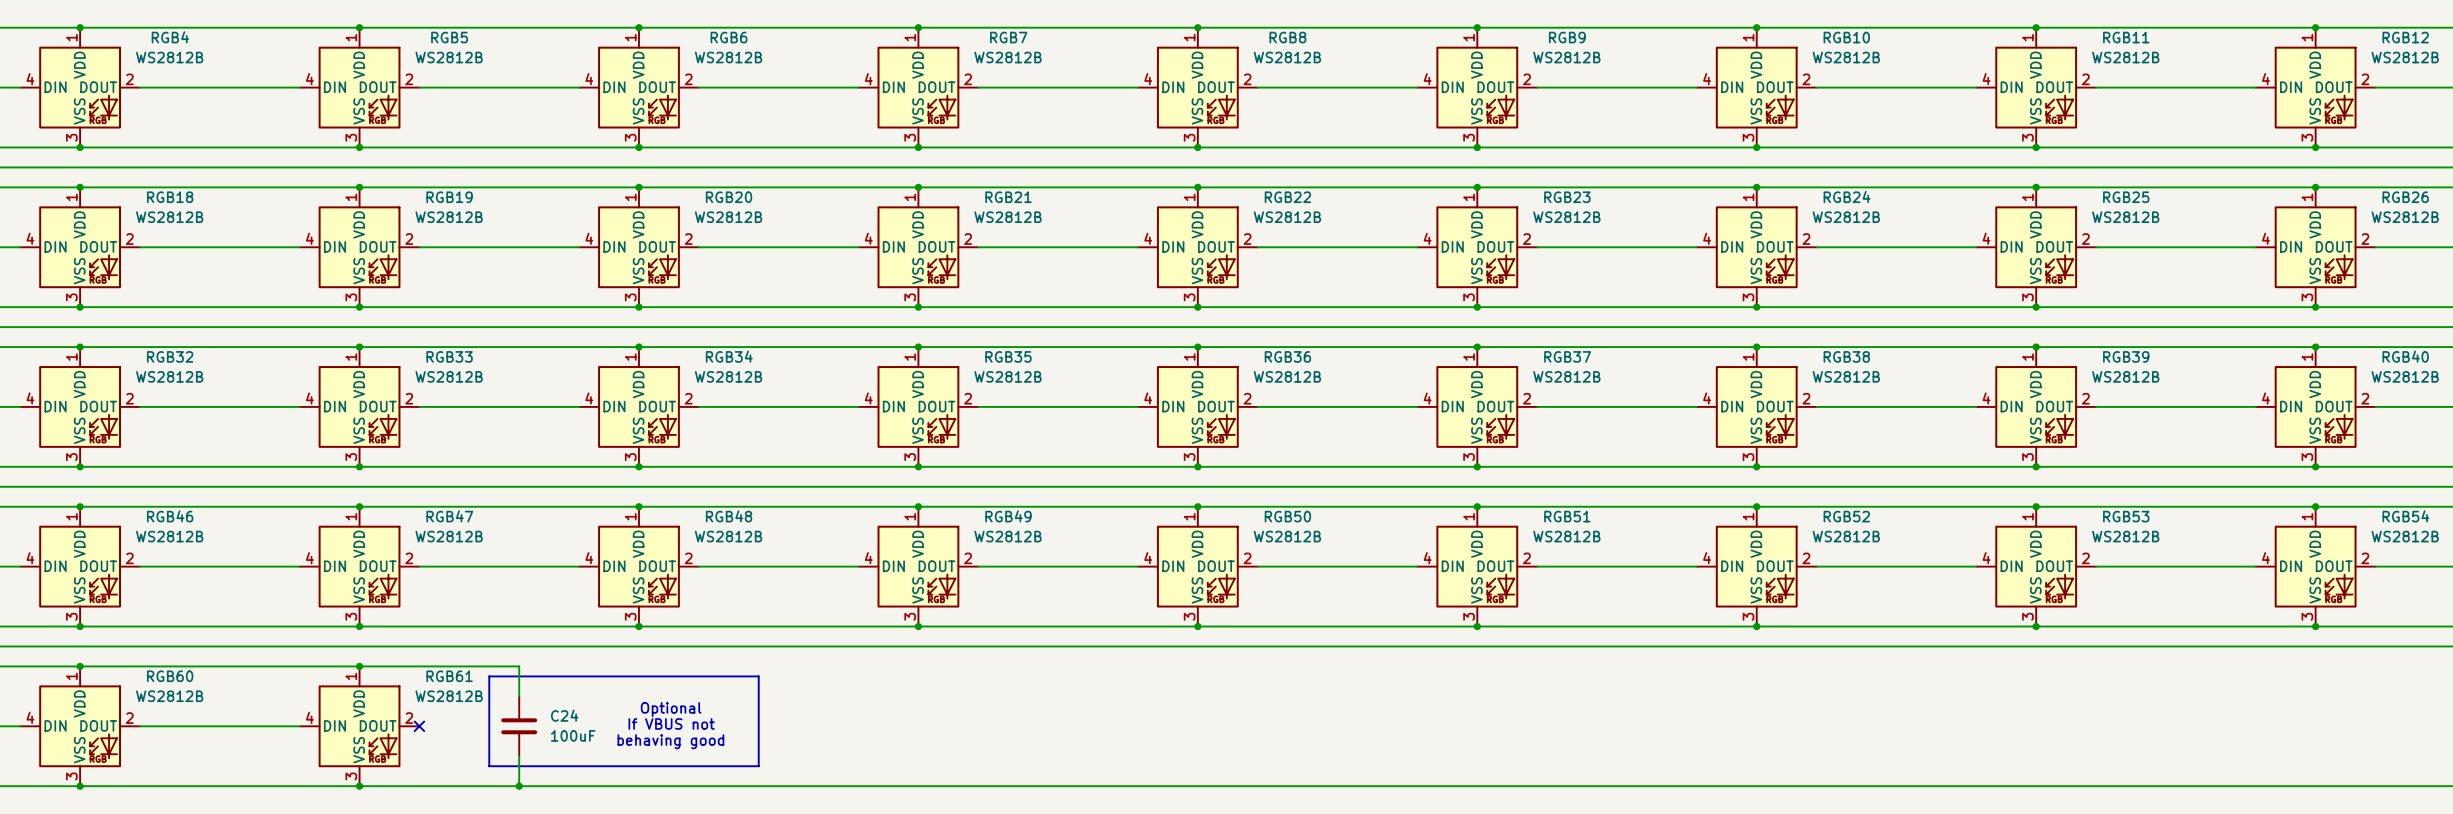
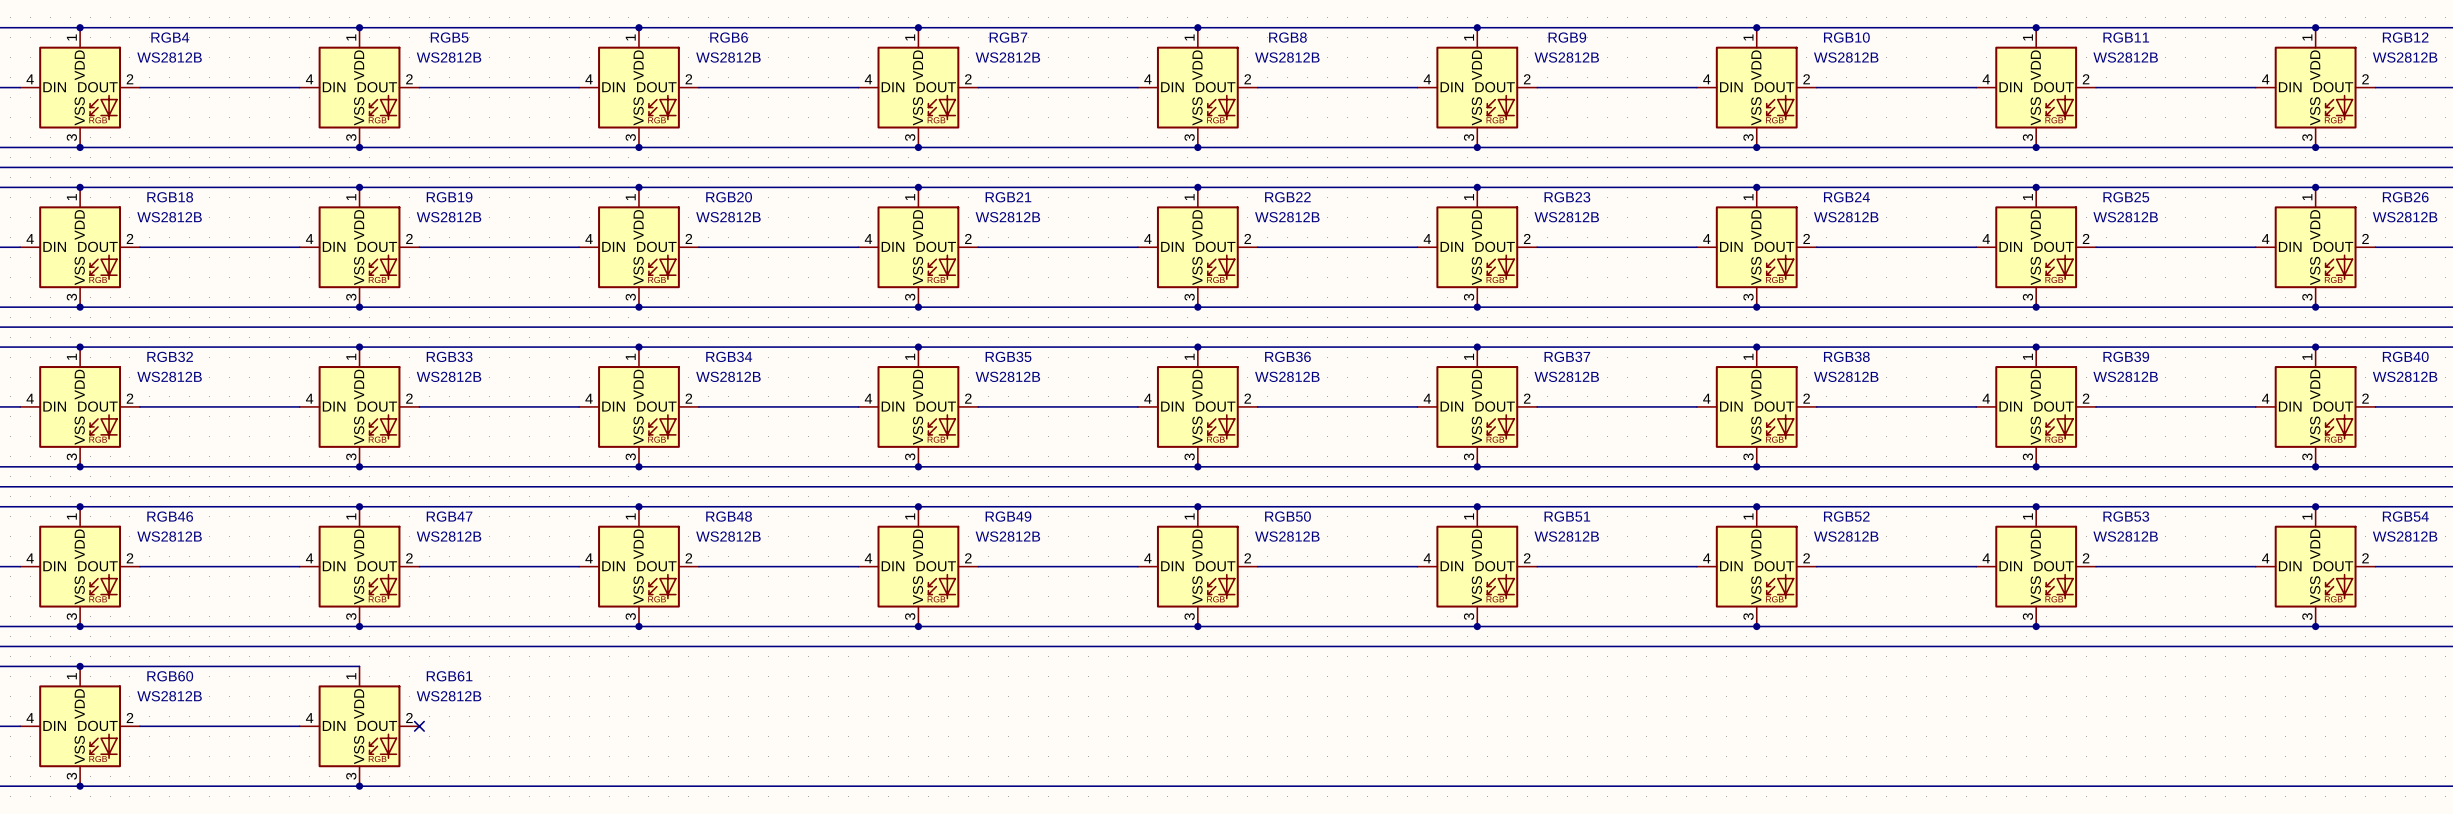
wire: (359, 666) (519, 666) (519, 696) -> none
junction: (359, 666) -> none
line: (489, 676) (758, 676) (758, 766) (489, 766) (489, 676) -> none
text: Optional (671, 709) -> none
text: If VBUS not (671, 723) -> none
C24: 100uF (519, 726) -> none
text: behaving good (670, 741) -> none
wire: (519, 756) (519, 786) -> none
junction: (519, 786) -> none

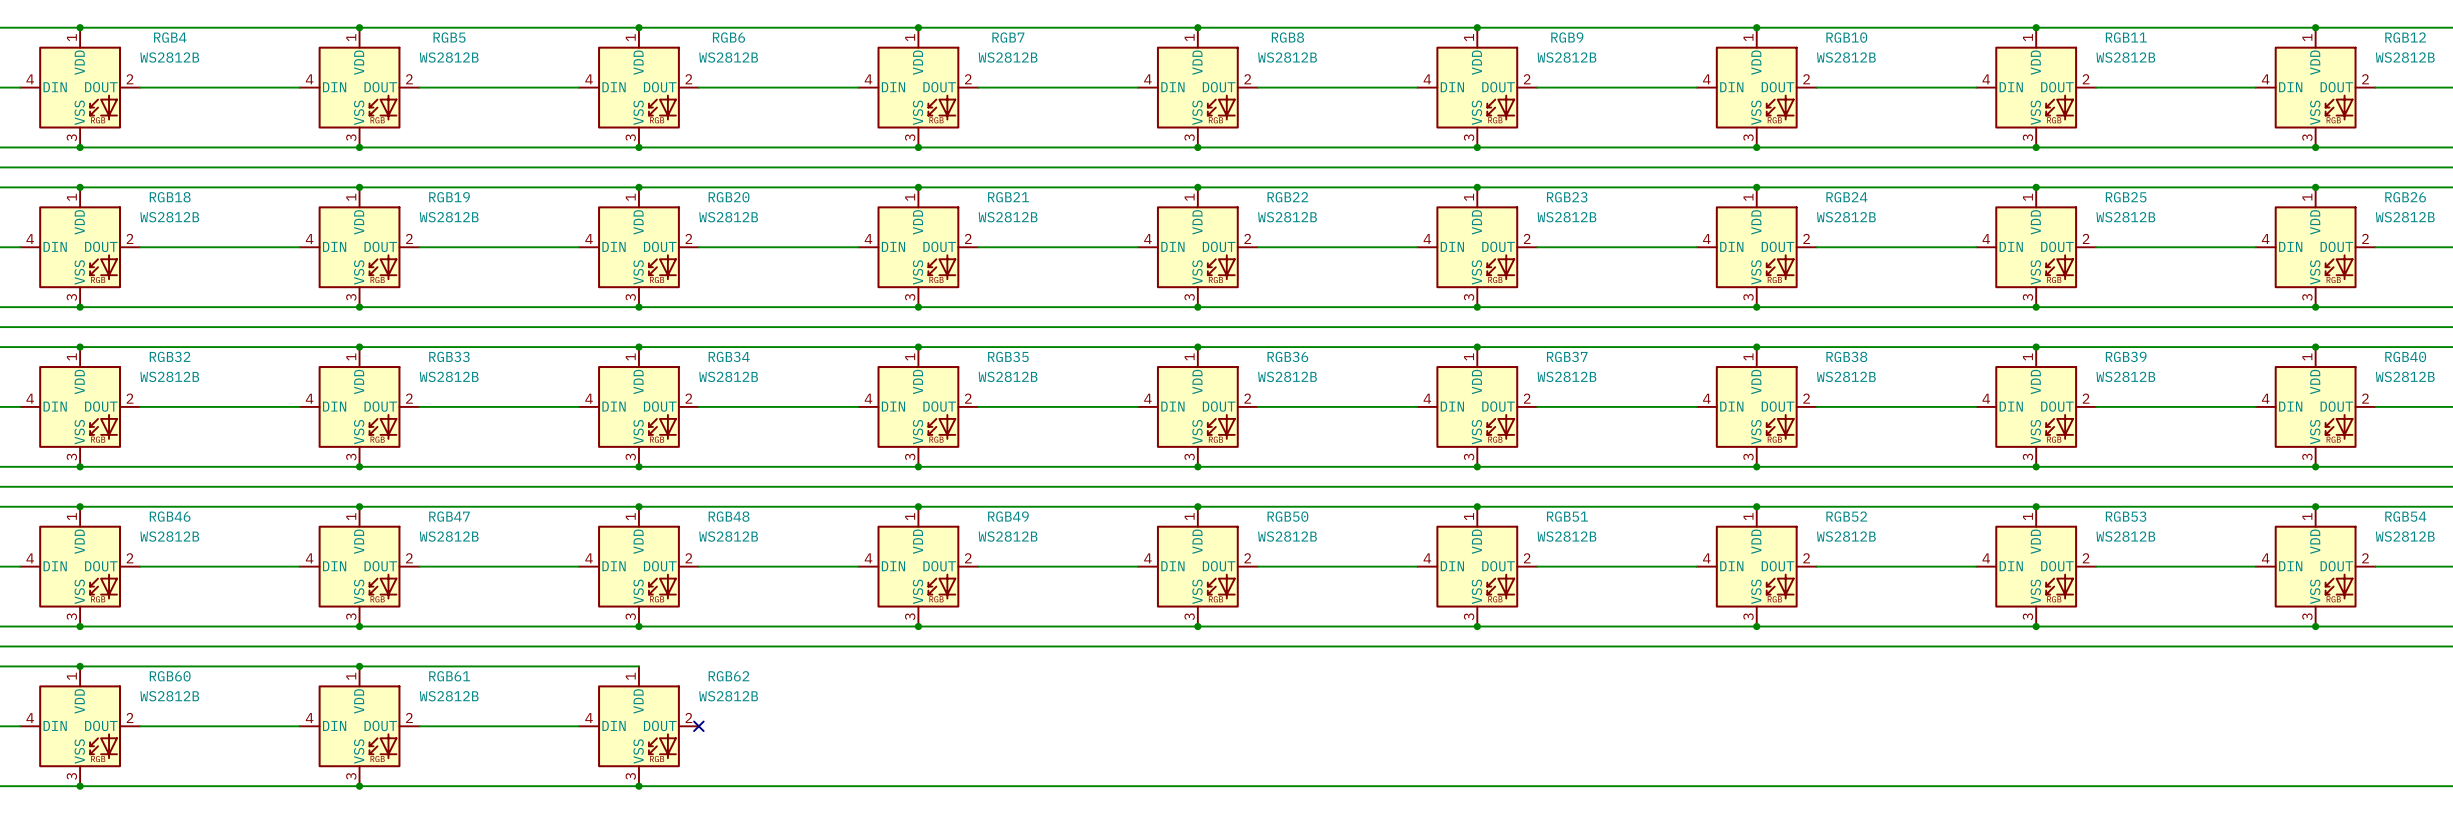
wire: none -> (359, 666) (638, 666)
junction: none -> (359, 666)
wire: none -> (419, 726) (579, 726)
no-connect mark: (419, 726) -> none
RGB62: none -> WS2812B (638, 726)
no-connect mark: none -> (698, 726)
junction: none -> (638, 786)

